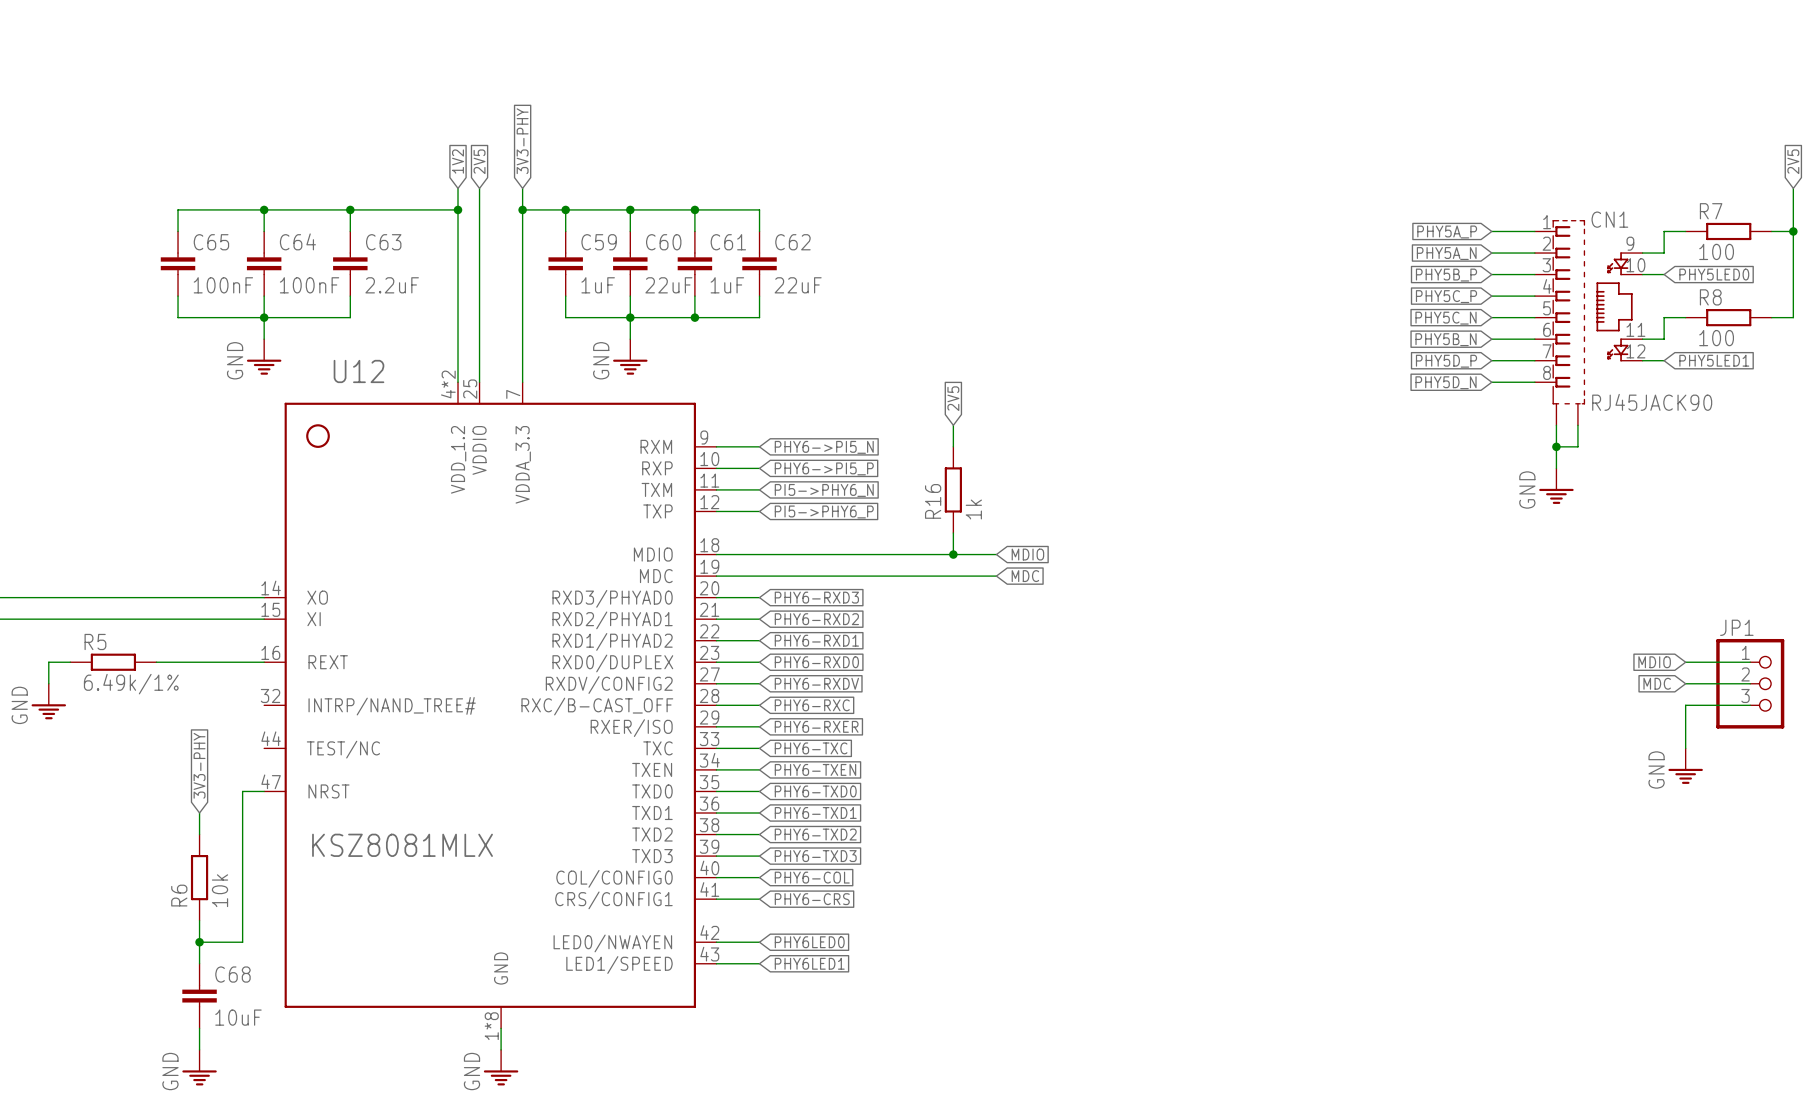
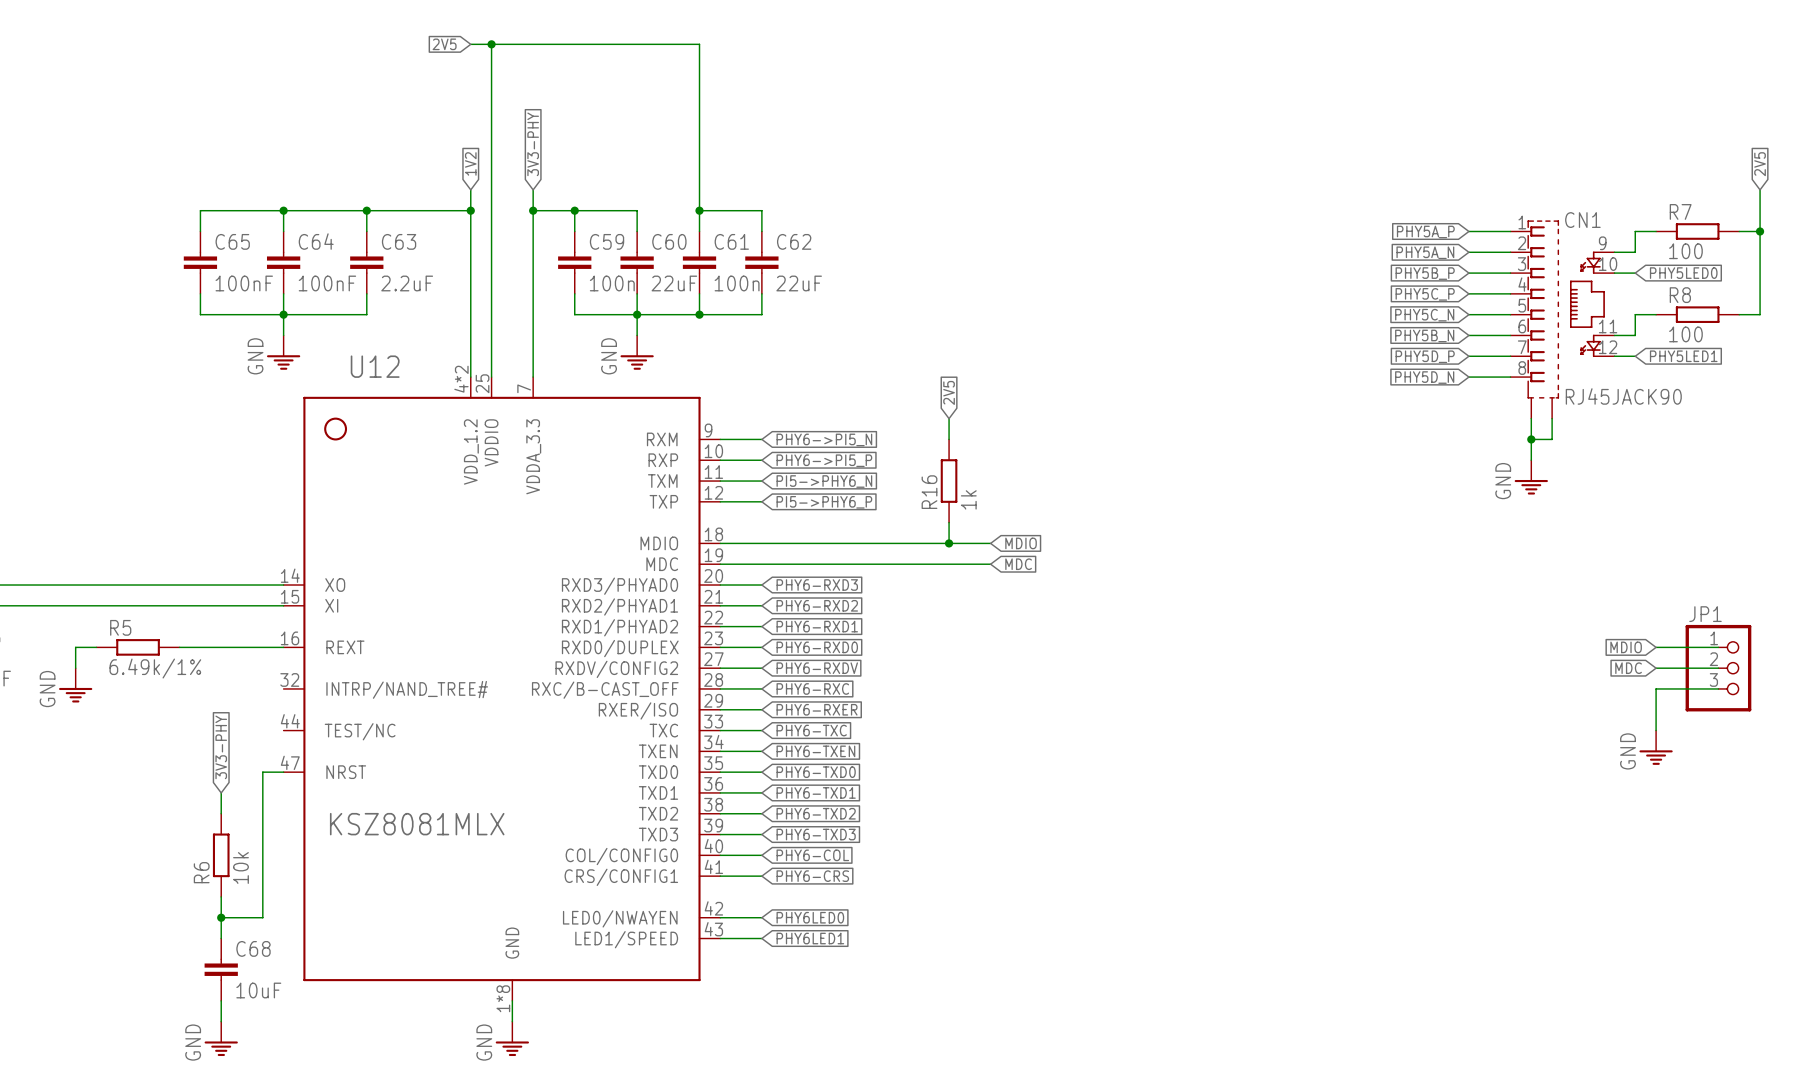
wire: none -> (491, 44) (491, 189)
junction: none -> (491, 44)
global label rotation: 0° (479, 161) -> 90° counterclockwise (444, 44)
global label position: 2V5 (479, 161) -> 2V5 (444, 44)
wire: (630, 209) (694, 209) -> (470, 44) (699, 44) (699, 210)
junction: (630, 209) -> none
C59 value: 1uF (598, 285) -> 100n (612, 283)
C61 value: 1uF (727, 285) -> 100n (737, 283)

